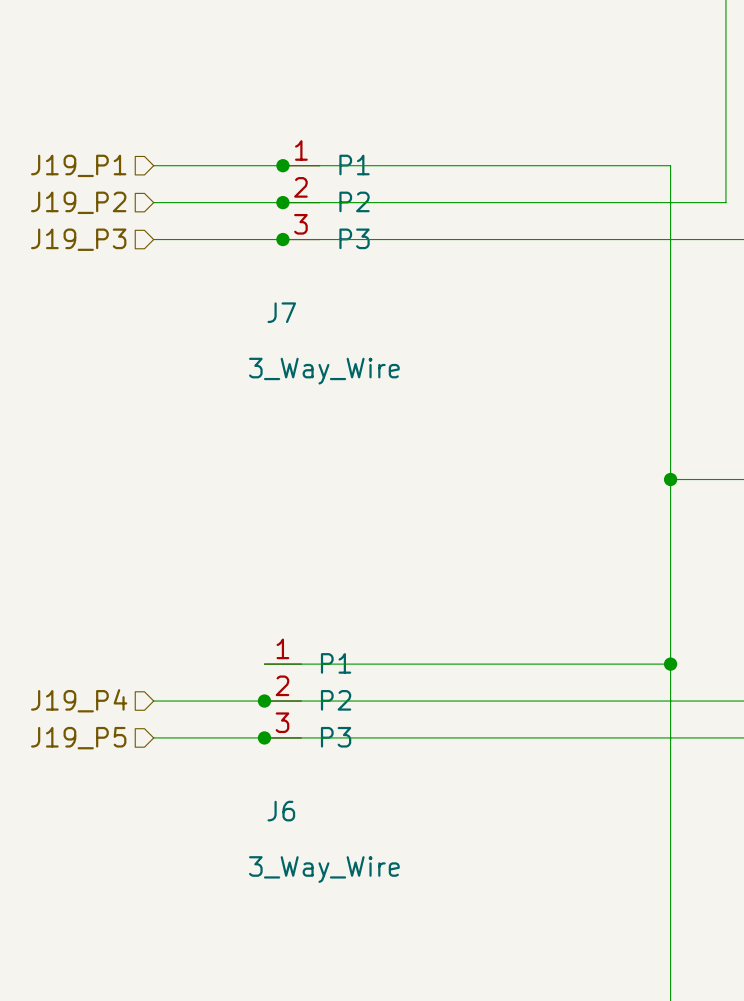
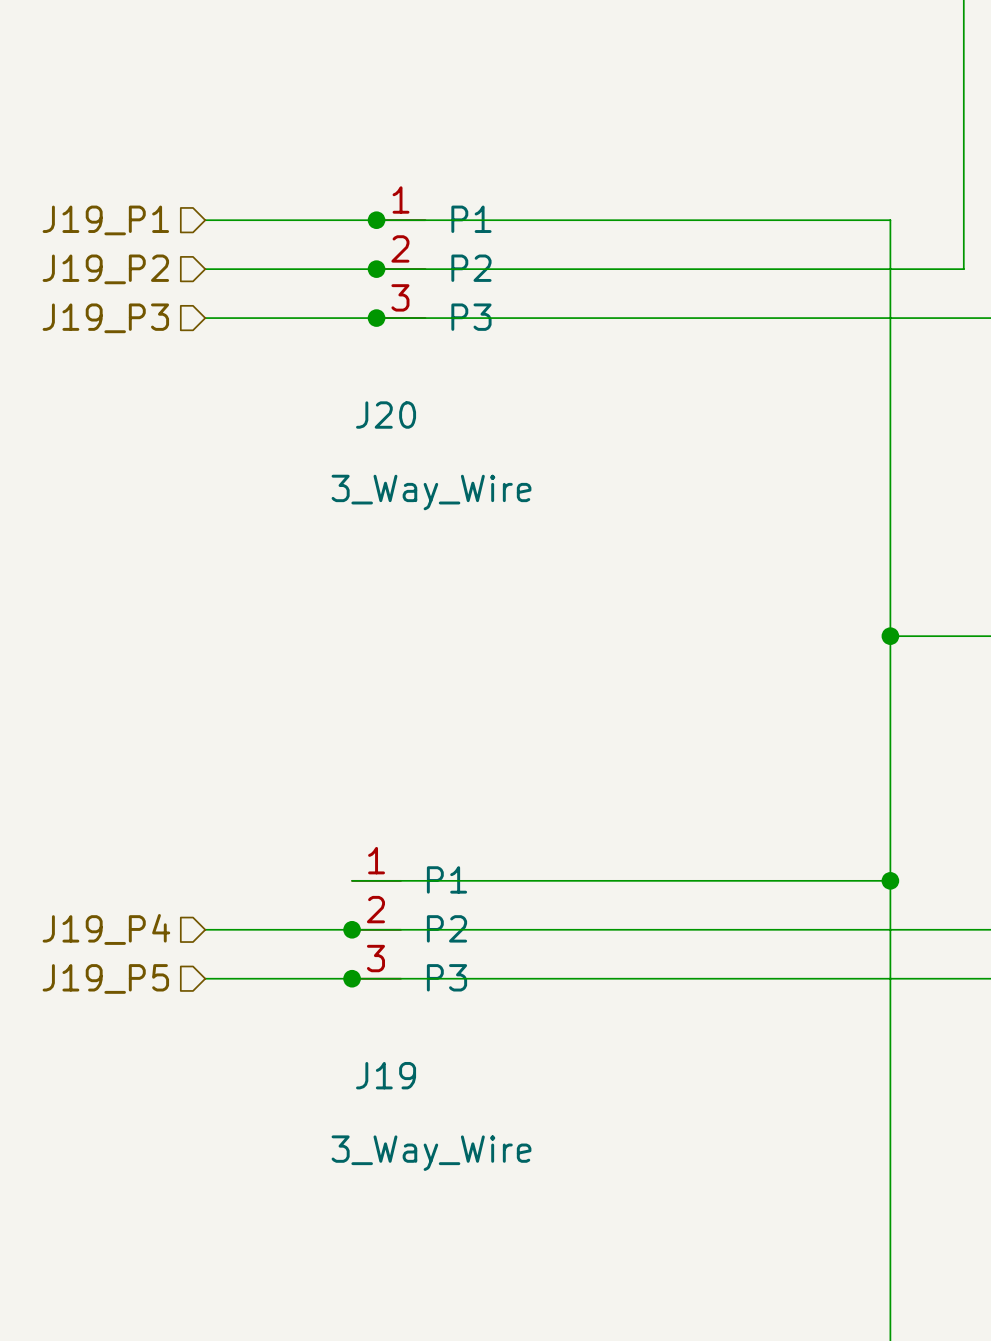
J7 name: J7 (281, 312) -> J20 (386, 415)
J6 name: J6 (281, 811) -> J19 (386, 1075)

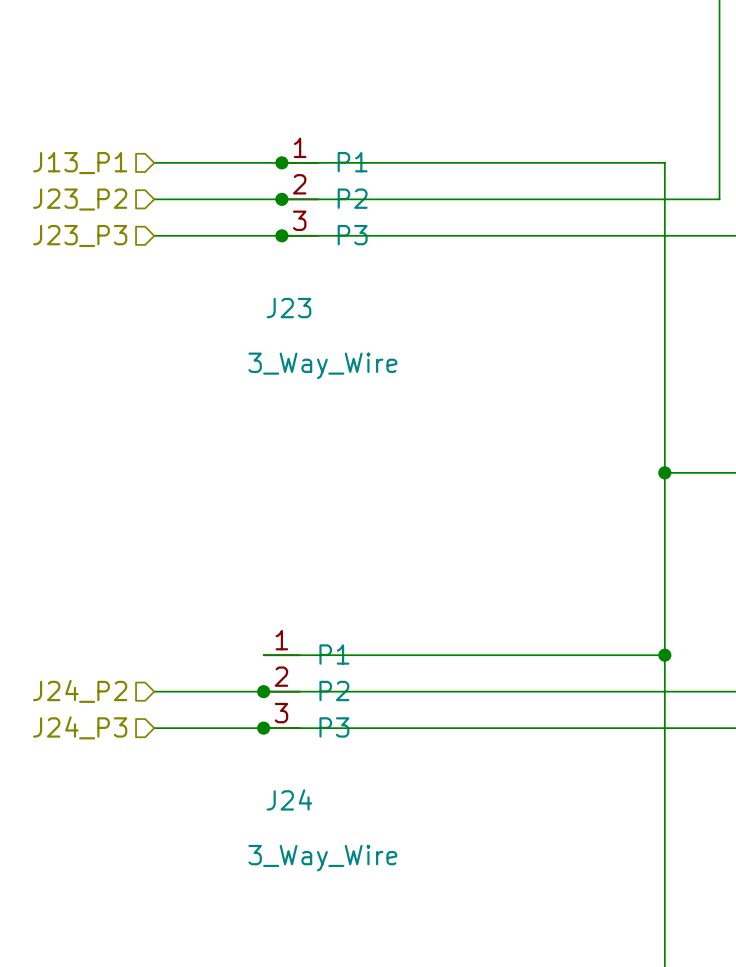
hierarchical label: J19_P1 (105, 220) -> J13_P1 (80, 163)
hierarchical label: J19_P2 (105, 269) -> J23_P2 (80, 199)
hierarchical label: J19_P3 (105, 318) -> J23_P3 (80, 235)
J20 name: J20 (386, 415) -> J23 (288, 308)
hierarchical label: J19_P4 (106, 929) -> J24_P2 (80, 691)
hierarchical label: J19_P5 (105, 978) -> J24_P3 (80, 727)
J19 name: J19 (386, 1075) -> J24 (289, 799)

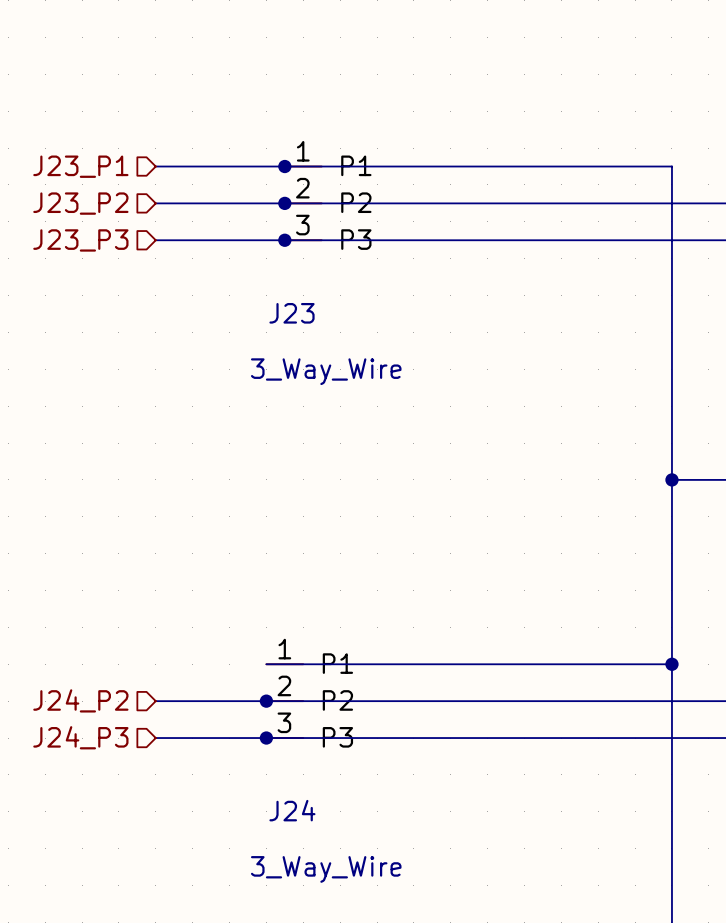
hierarchical label: J13_P1 (80, 163) -> J23_P1 (80, 166)

